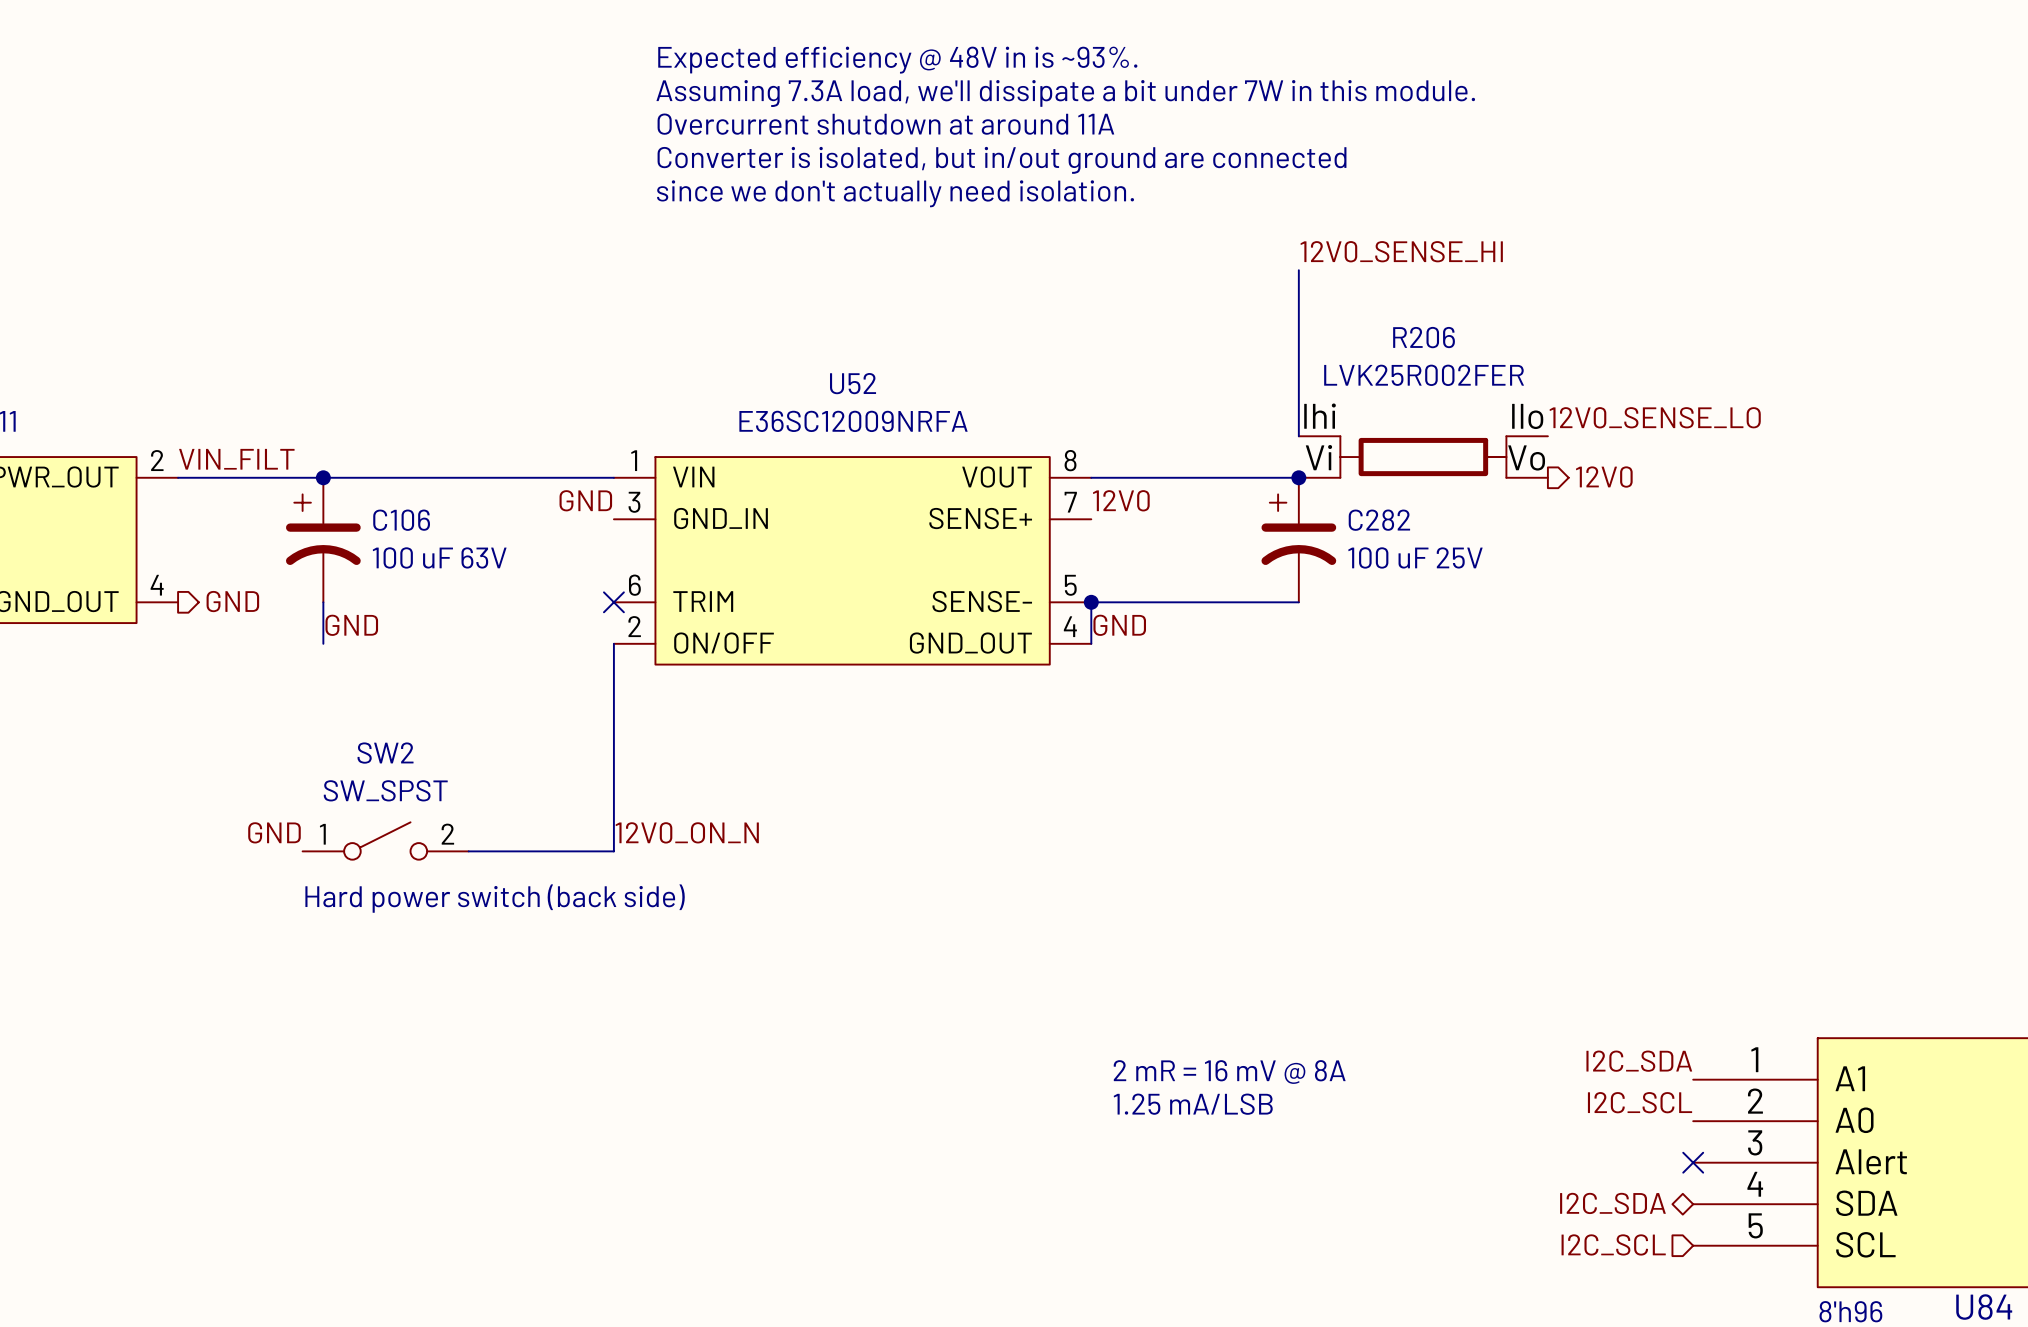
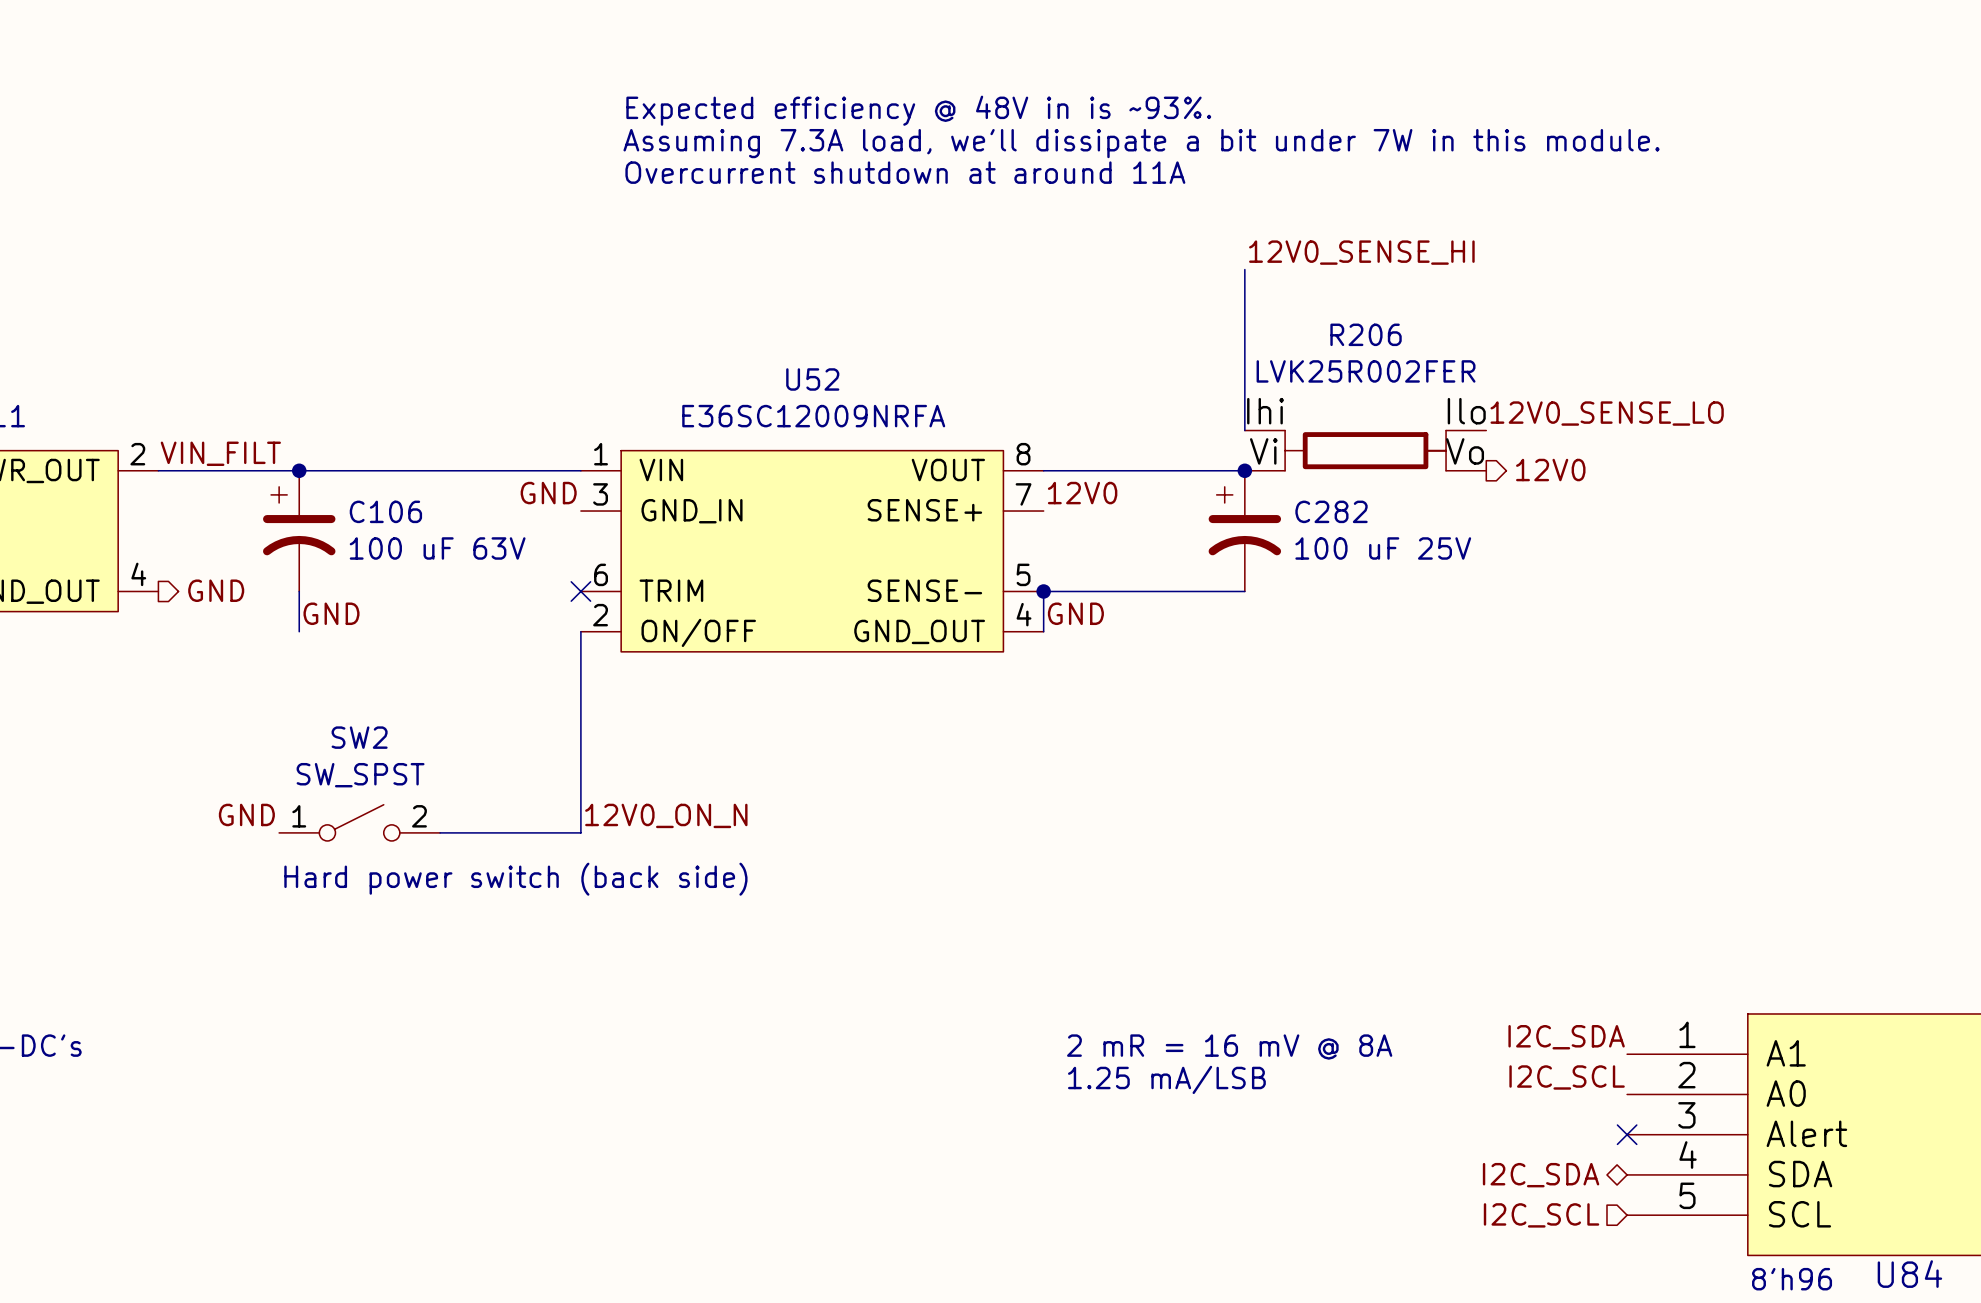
text position: Expected efficiency @ 48V in is ~93%. (897, 60) -> Expected efficiency @ 48V in is ~93%. (918, 110)
text position: Assuming 7.3A load, we'll dissipate a bit under 7W in this module. (1065, 93) -> Assuming 7.3A load, we'll dissipate a bit under 7W in this module. (1141, 143)
text position: Overcurrent shutdown at around 11A (885, 124) -> Overcurrent shutdown at around 11A (905, 172)
text: Converter is isolated, but in/out ground are connected (1002, 160) -> none
text: since we don't actually need isolation. (895, 193) -> none

